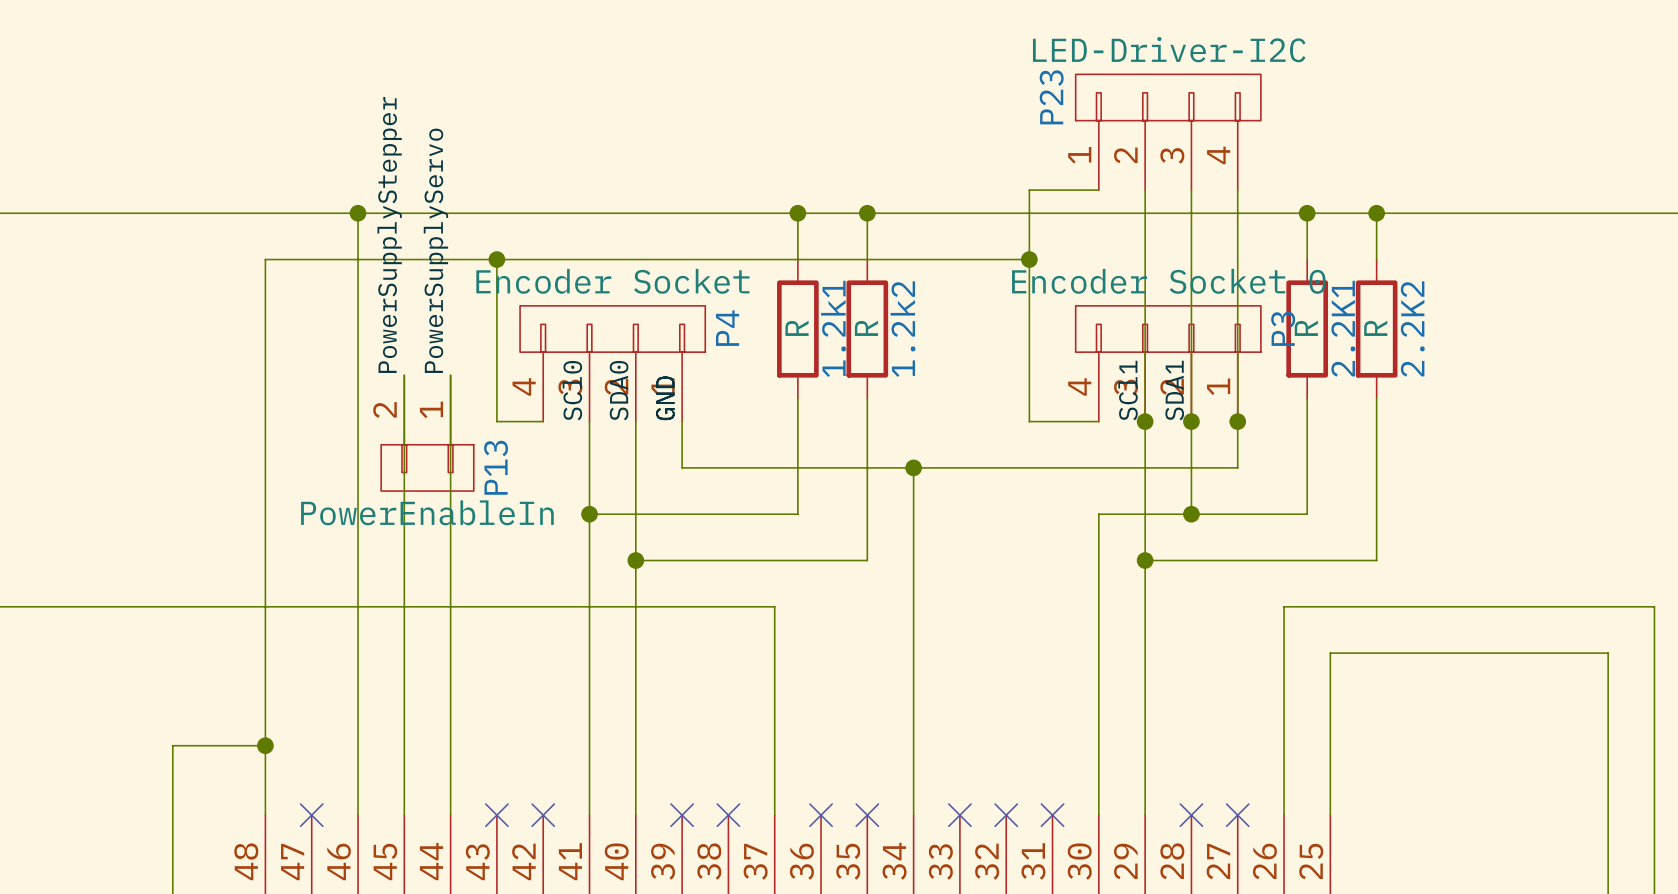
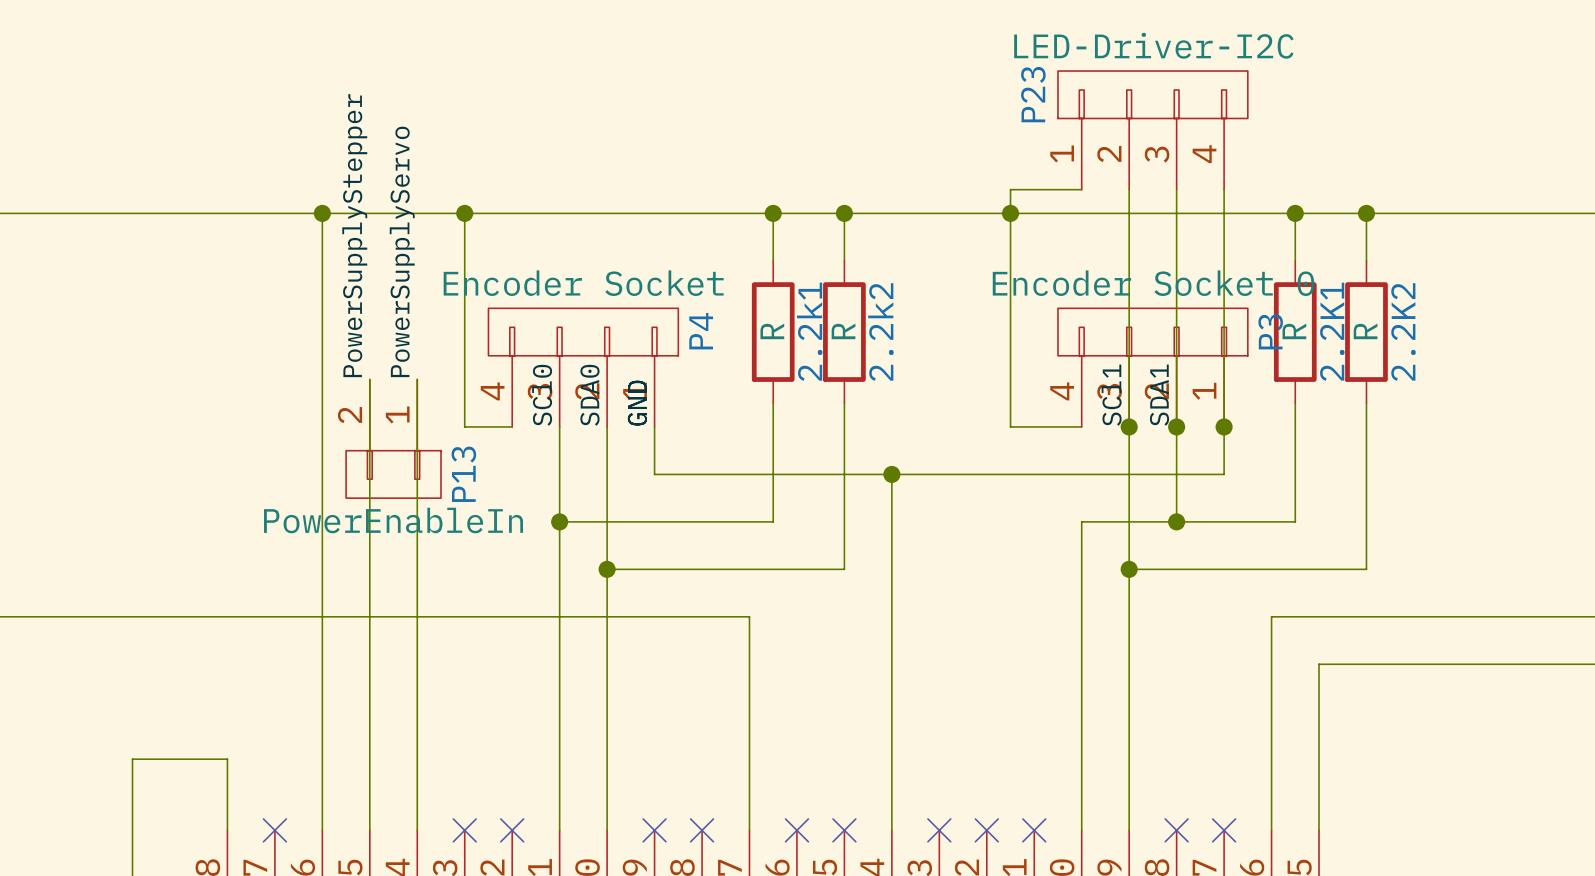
wire: none -> (464, 213) (464, 260)
junction position: (496, 259) -> (464, 213)
wire: (1029, 259) (265, 259) (265, 745) -> none
junction position: (1029, 259) -> (1010, 213)
1.2k1 name: 1.2k1 (833, 328) -> 2.2k1 (809, 331)
1.2k2 name: 1.2k2 (902, 329) -> 2.2k2 (880, 332)
junction: (265, 745) -> none

